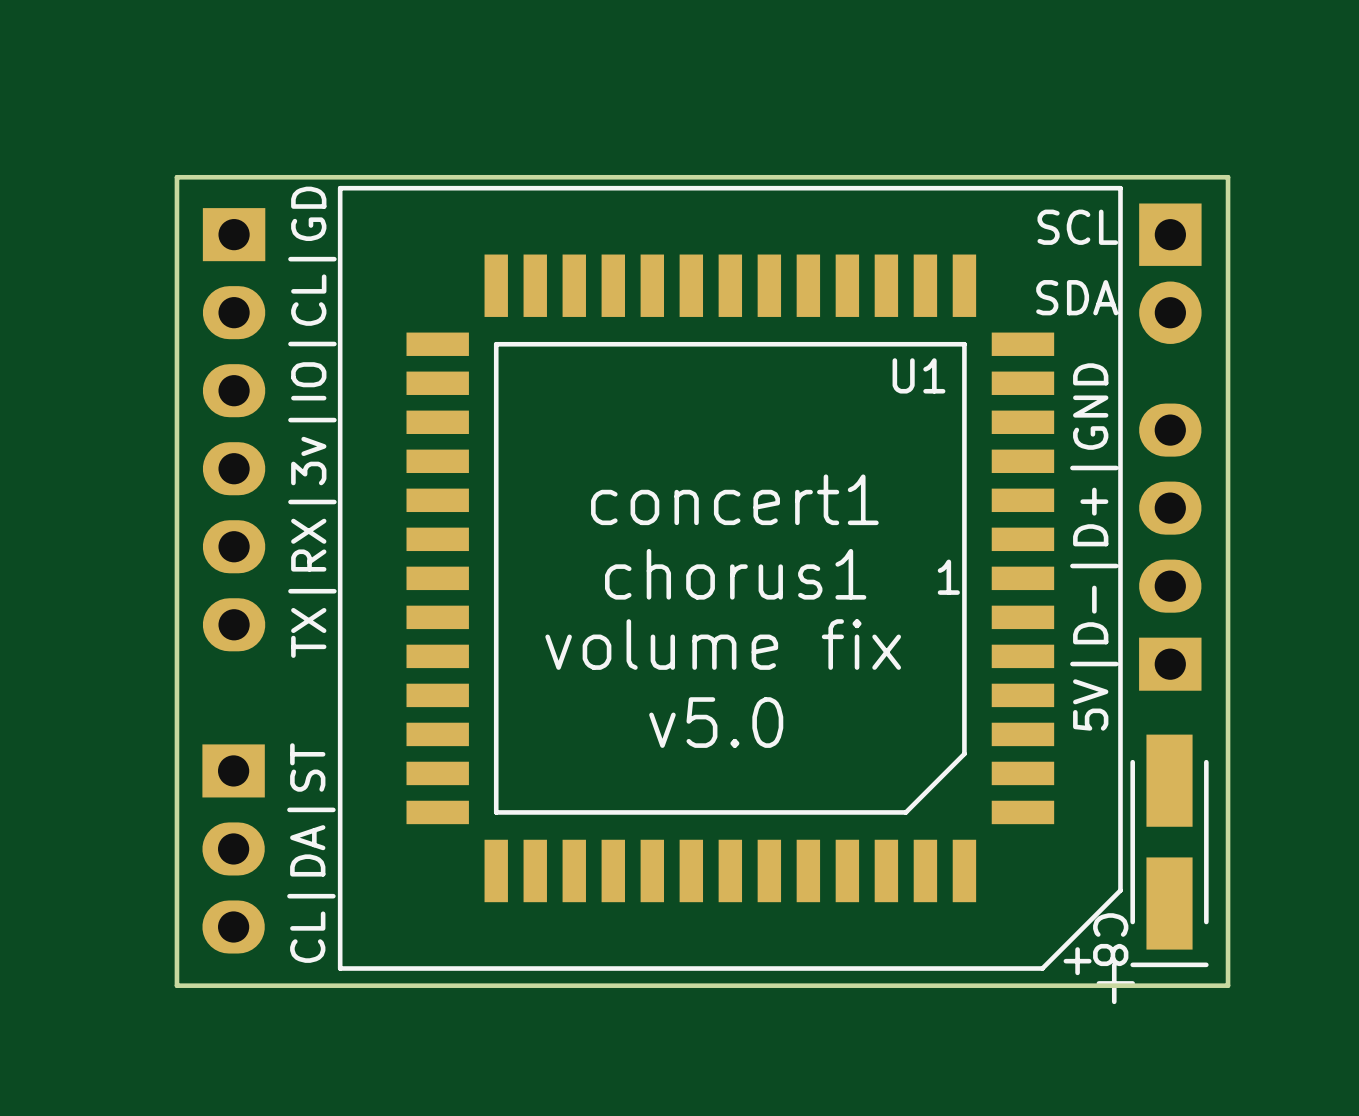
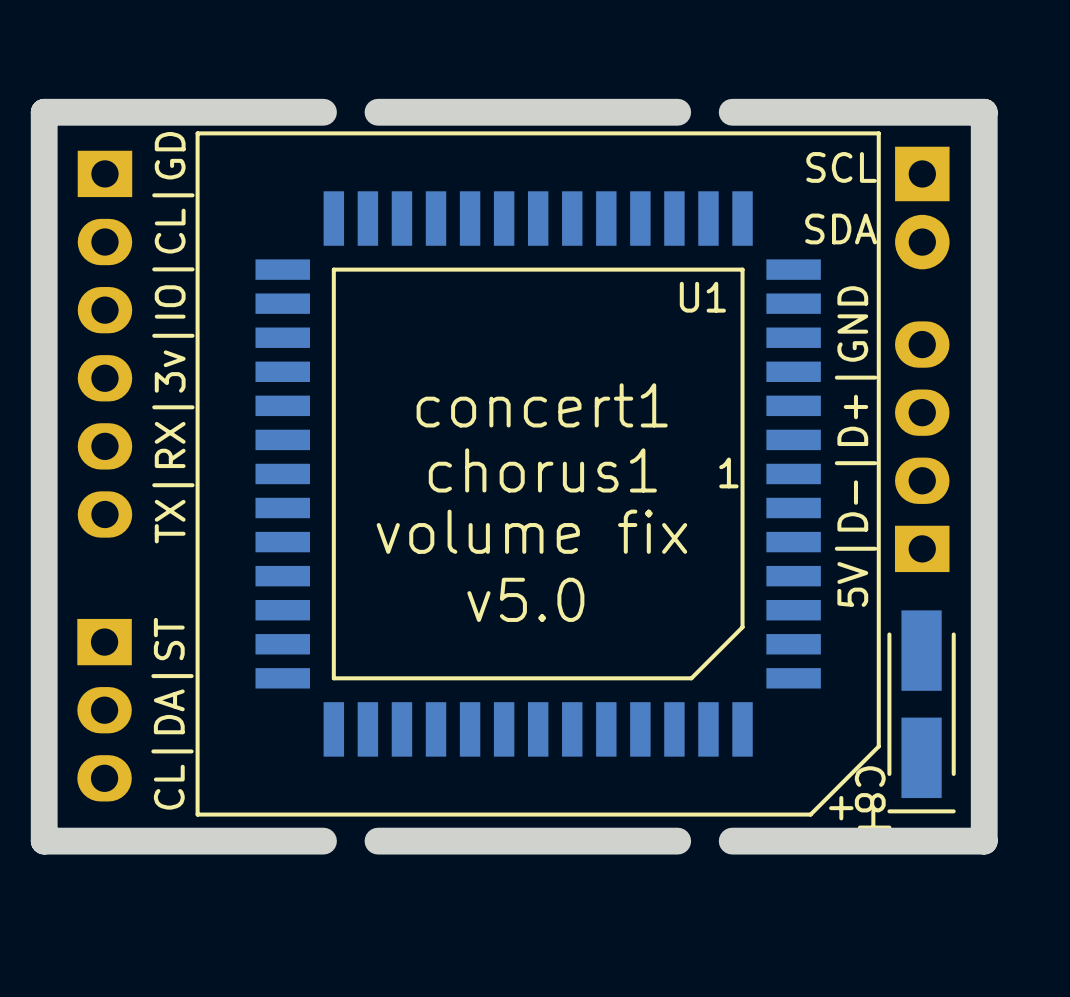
board edge: none -> (323, 112) (44, 112) (44, 841) (323, 841)
board edge: none -> (677, 112) (377, 112)
board edge: none -> (732, 112) (984, 112) (984, 841) (732, 841)
board edge: (1228, 177) (1228, 985) (176, 985) (176, 177) (1228, 177) -> none
board edge: none -> (677, 841) (377, 841)

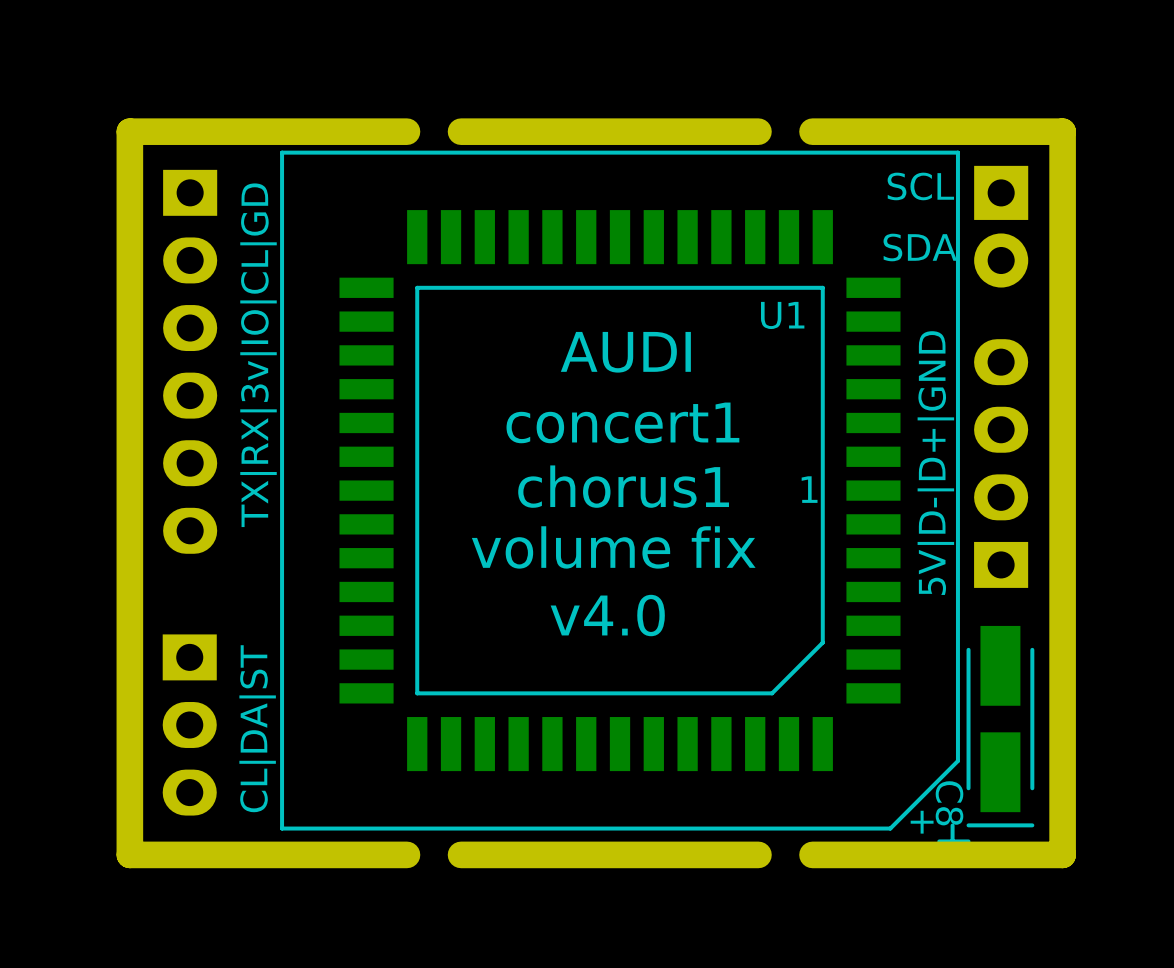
text: none -> AUDI (625, 352)
text: v5.0 (525, 599) -> v4.0 (607, 615)

